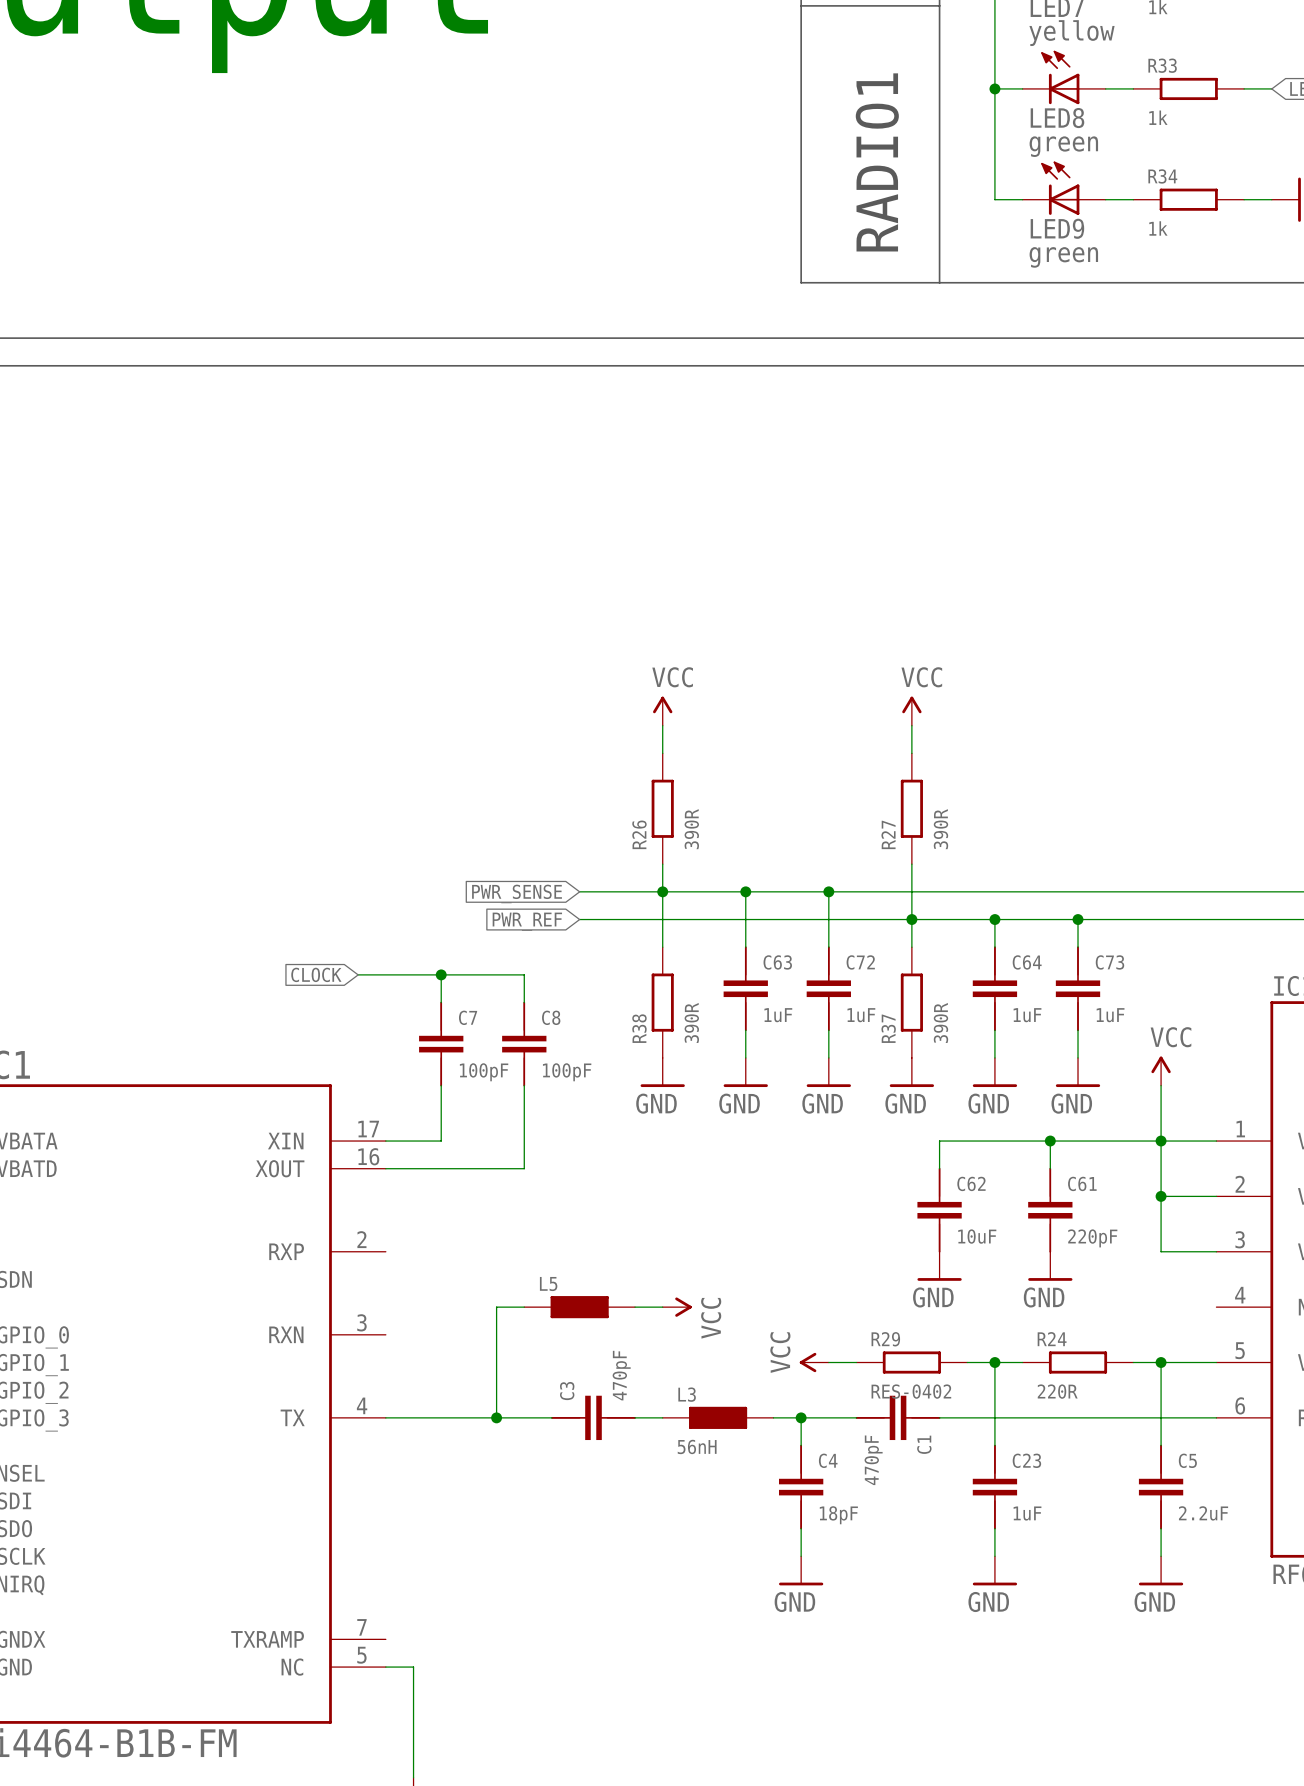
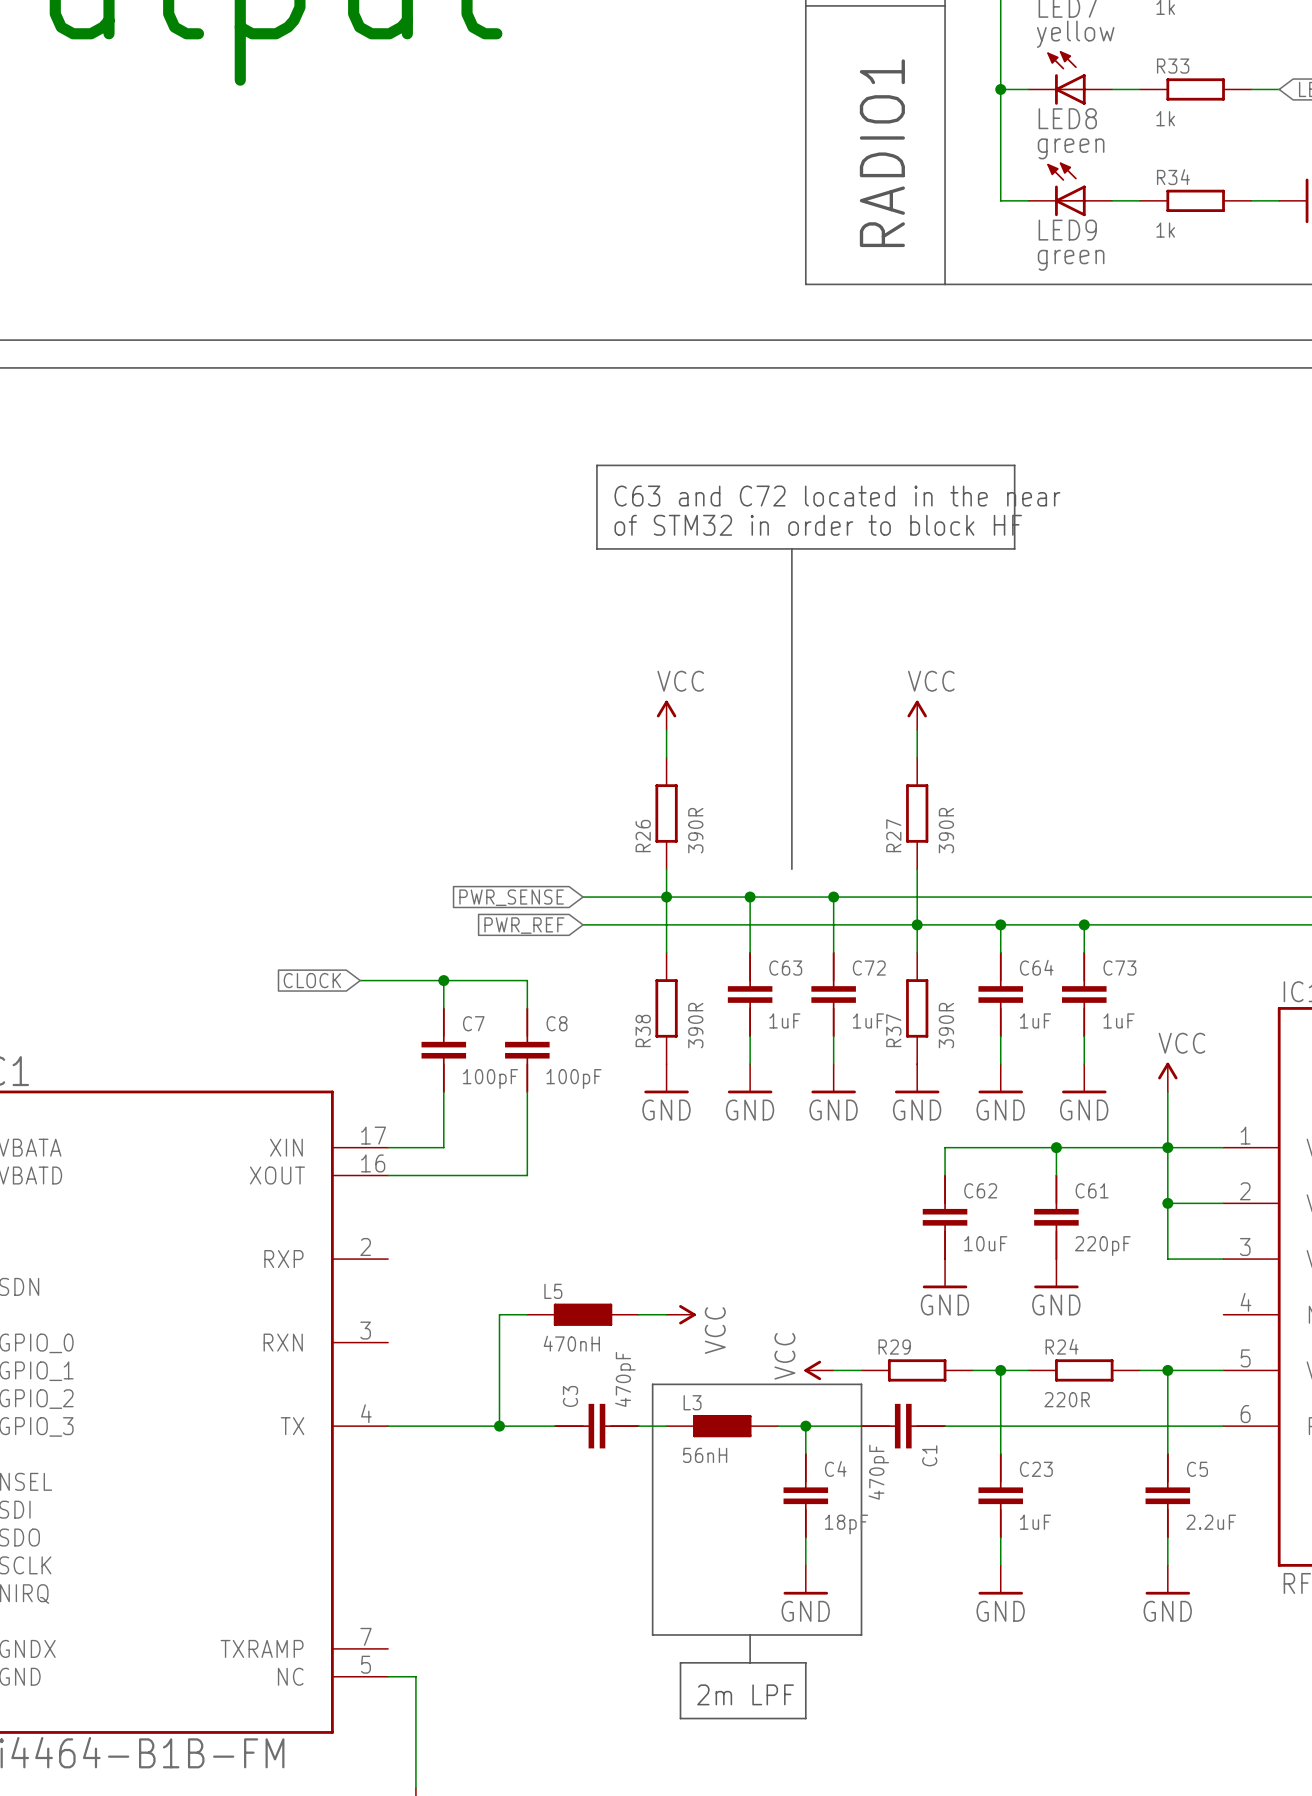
line: none -> (596, 465) (1014, 465) (1014, 548) (596, 548) (596, 465)
text: none -> C63 and C72 located in the near (837, 496)
text: none -> of STM32 in order to block HF (818, 525)
line: none -> (791, 548) (791, 869)
L5 value: none -> 470nH (571, 1343)
line: none -> (652, 1384) (861, 1384) (861, 1634) (652, 1634) (652, 1384)
R29 value: RES-0402 (911, 1391) -> none
line: none -> (750, 1634) (750, 1662)
line: none -> (680, 1662) (805, 1662) (805, 1718) (680, 1718) (680, 1662)
text: none -> 2m LPF (745, 1694)

